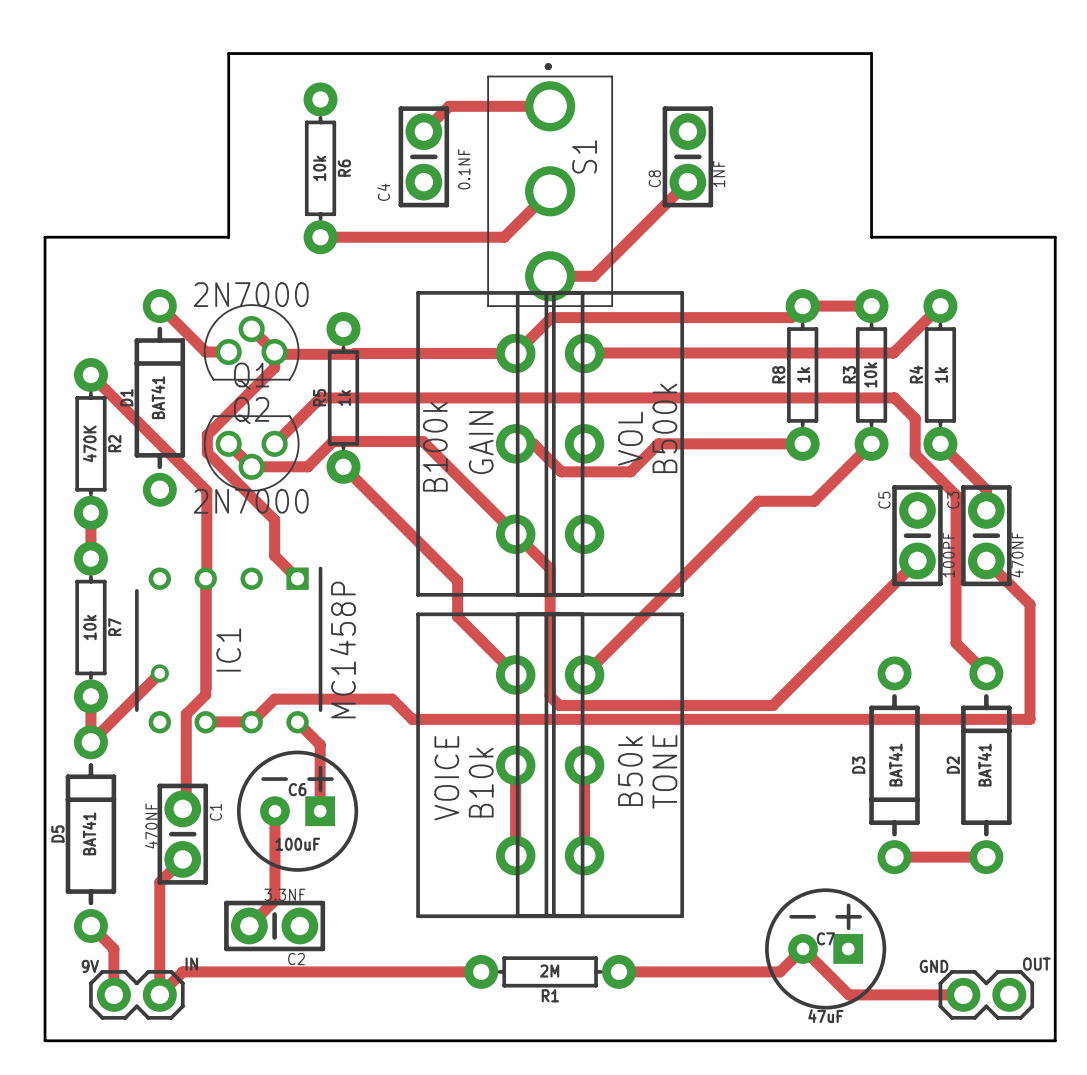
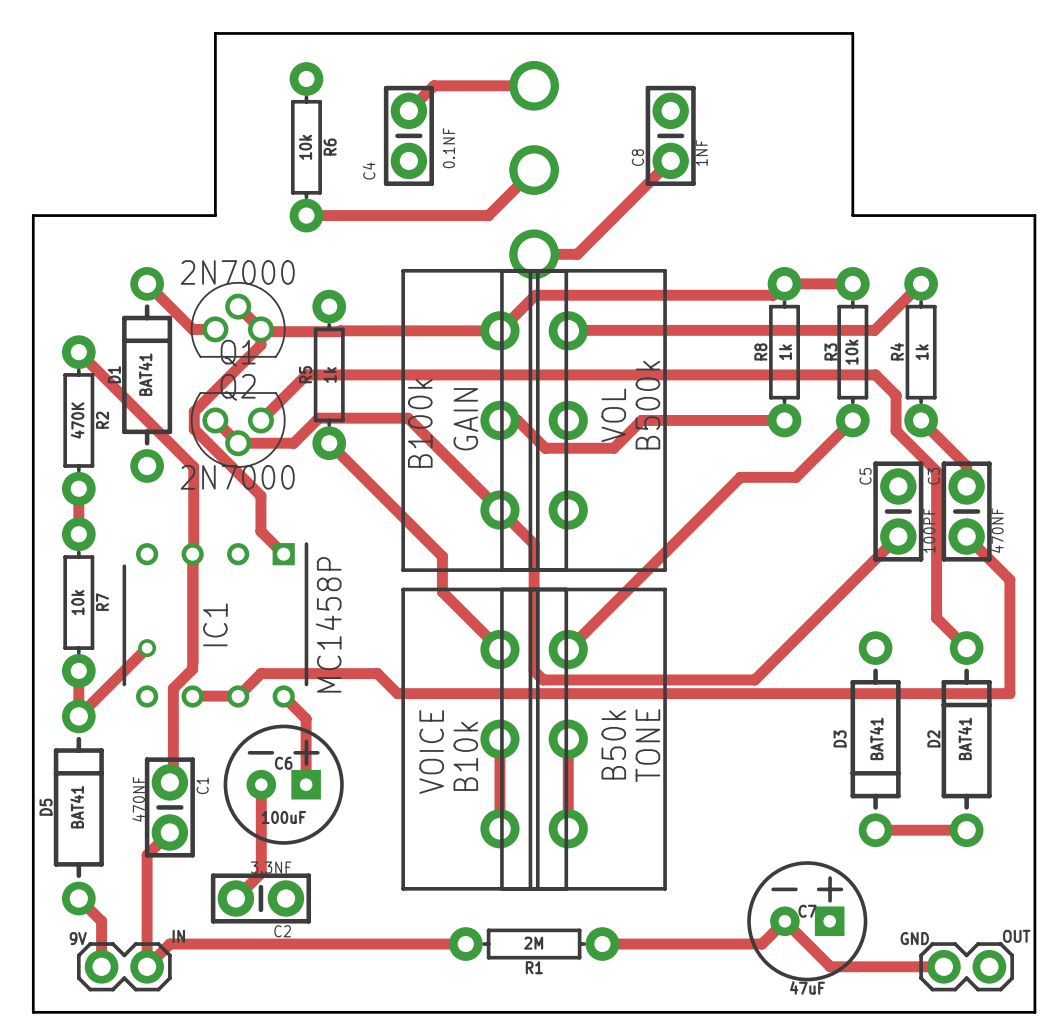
S1 side: top (550, 184) -> bottom (534, 170)

